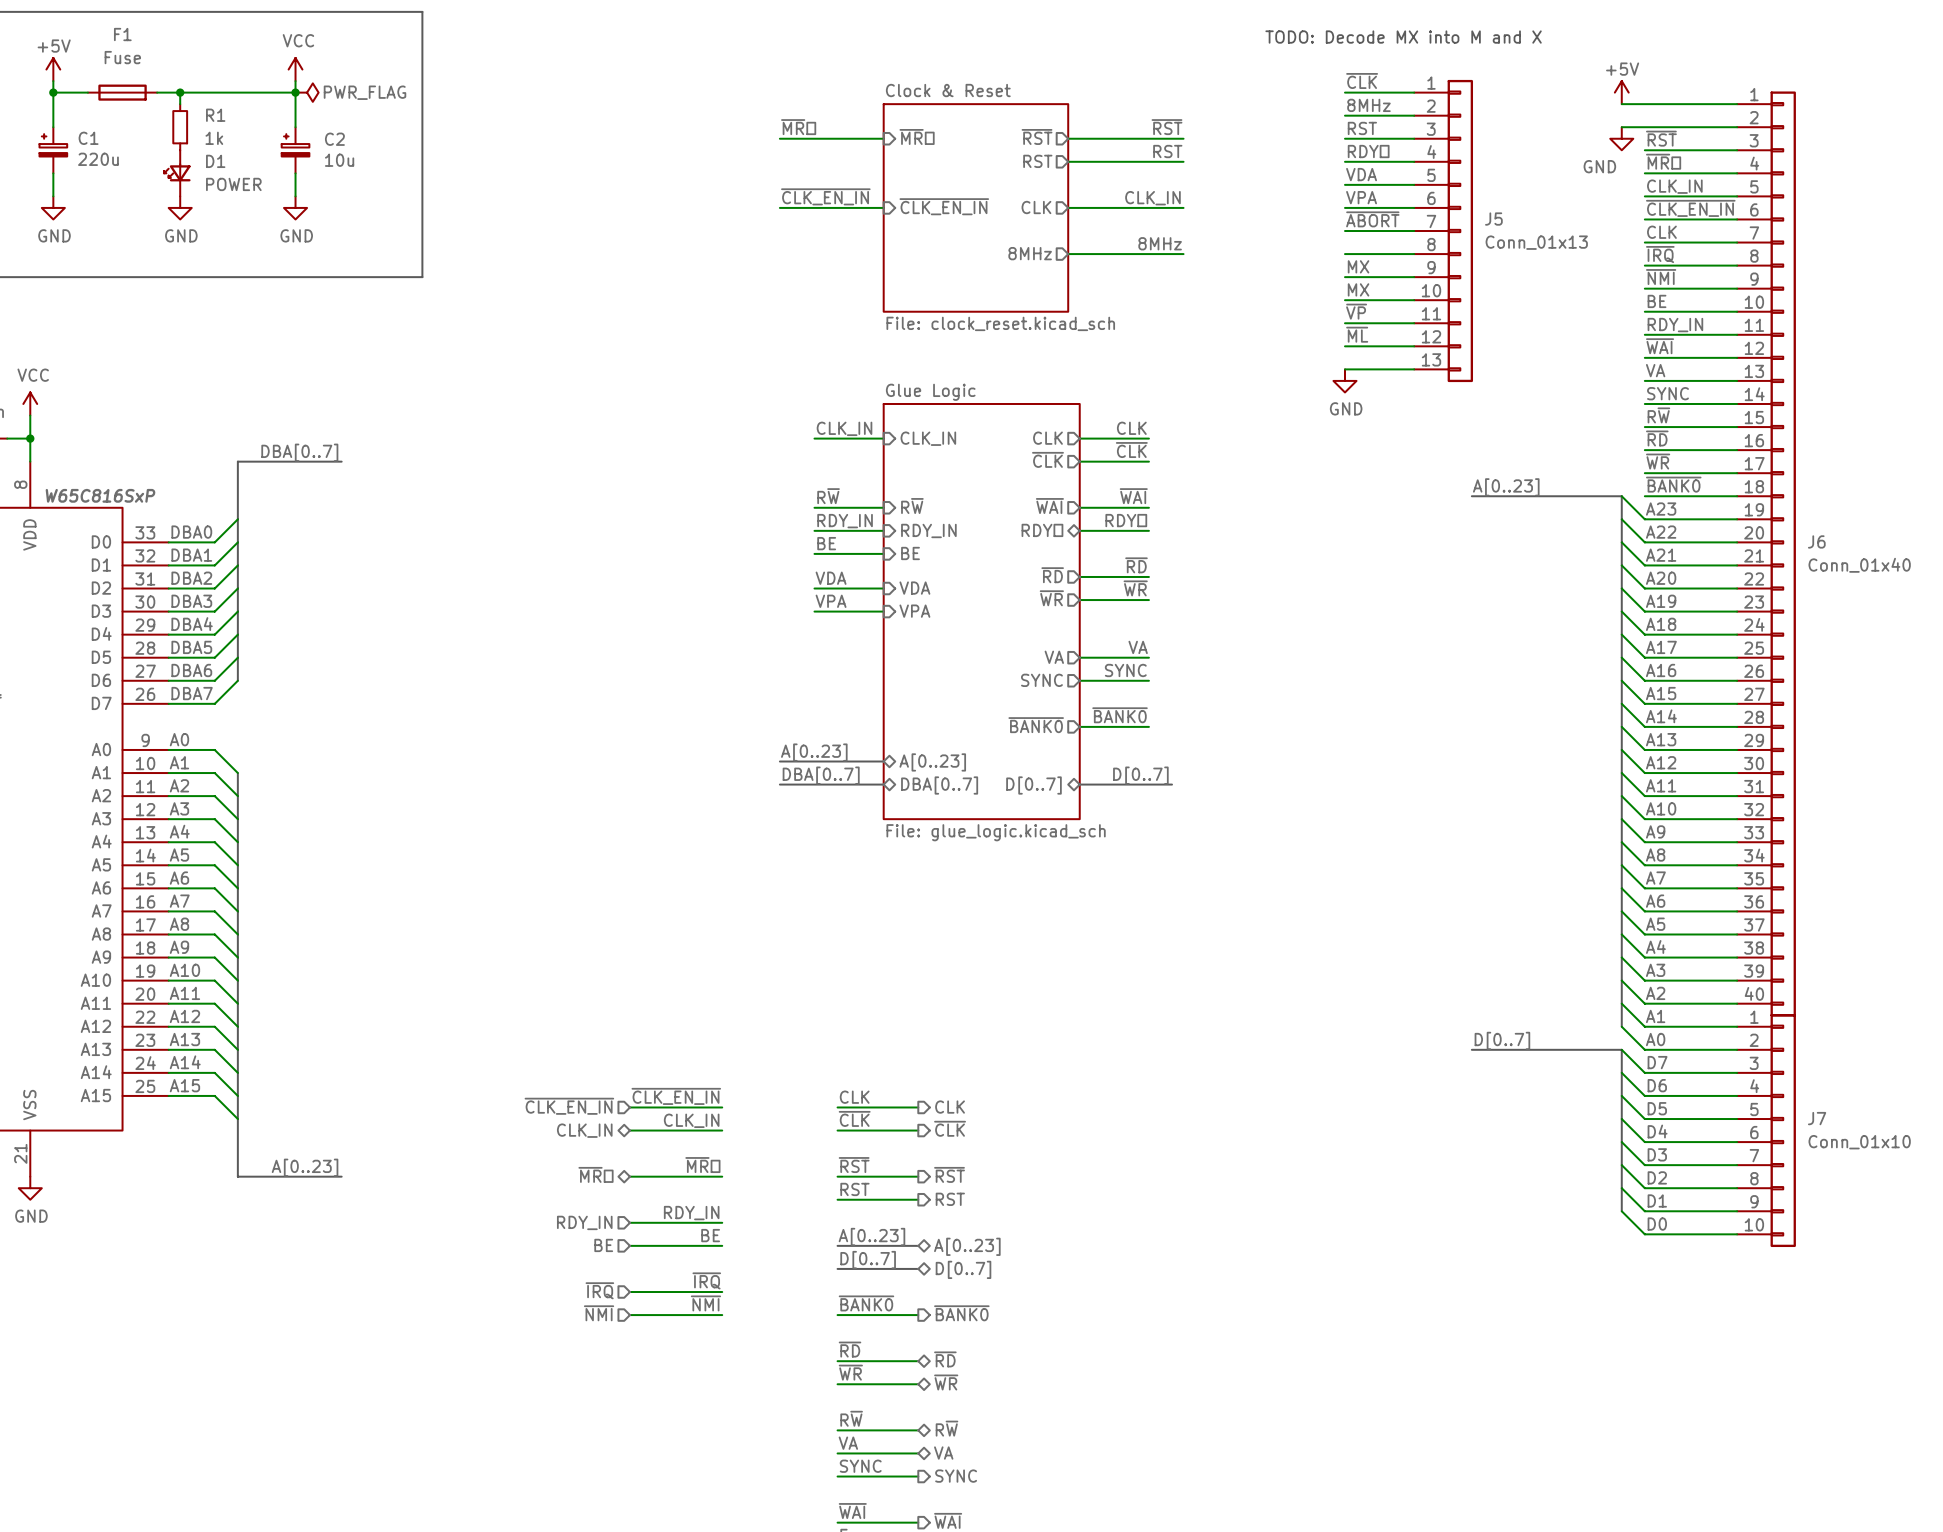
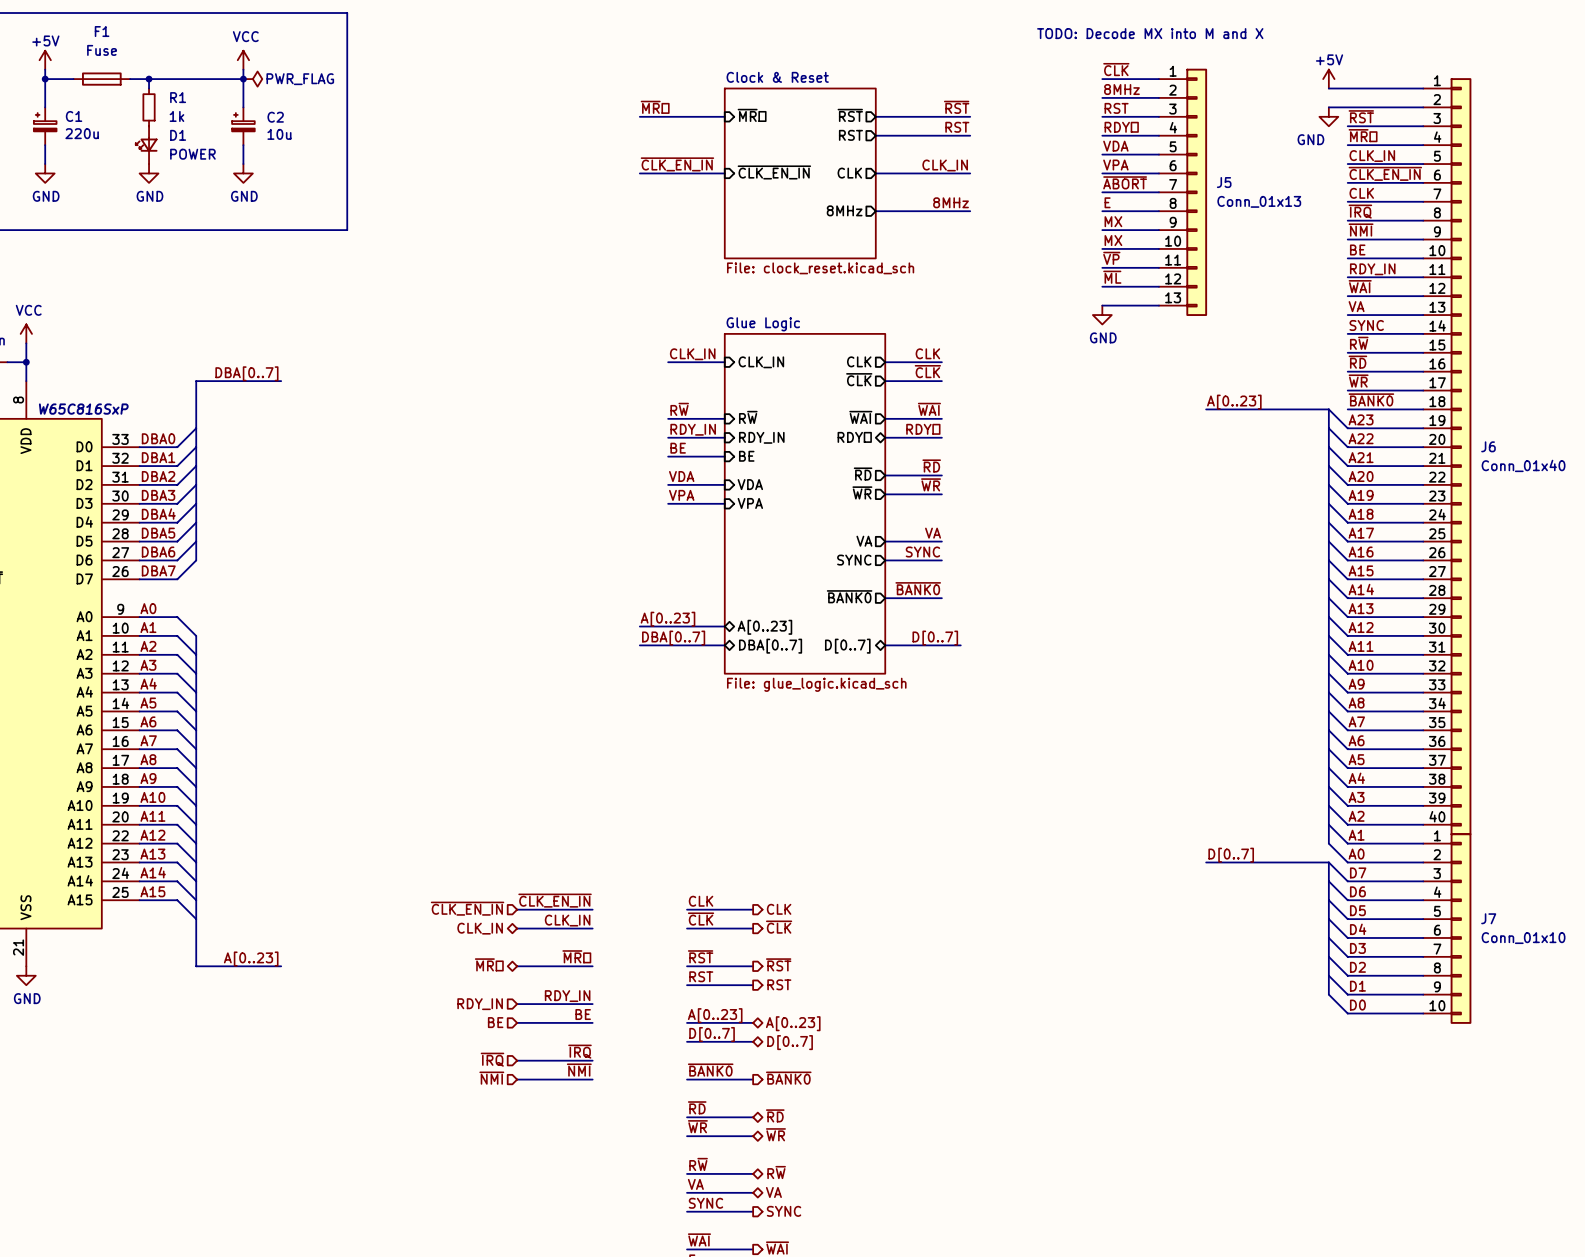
label: none -> E (1107, 202)

